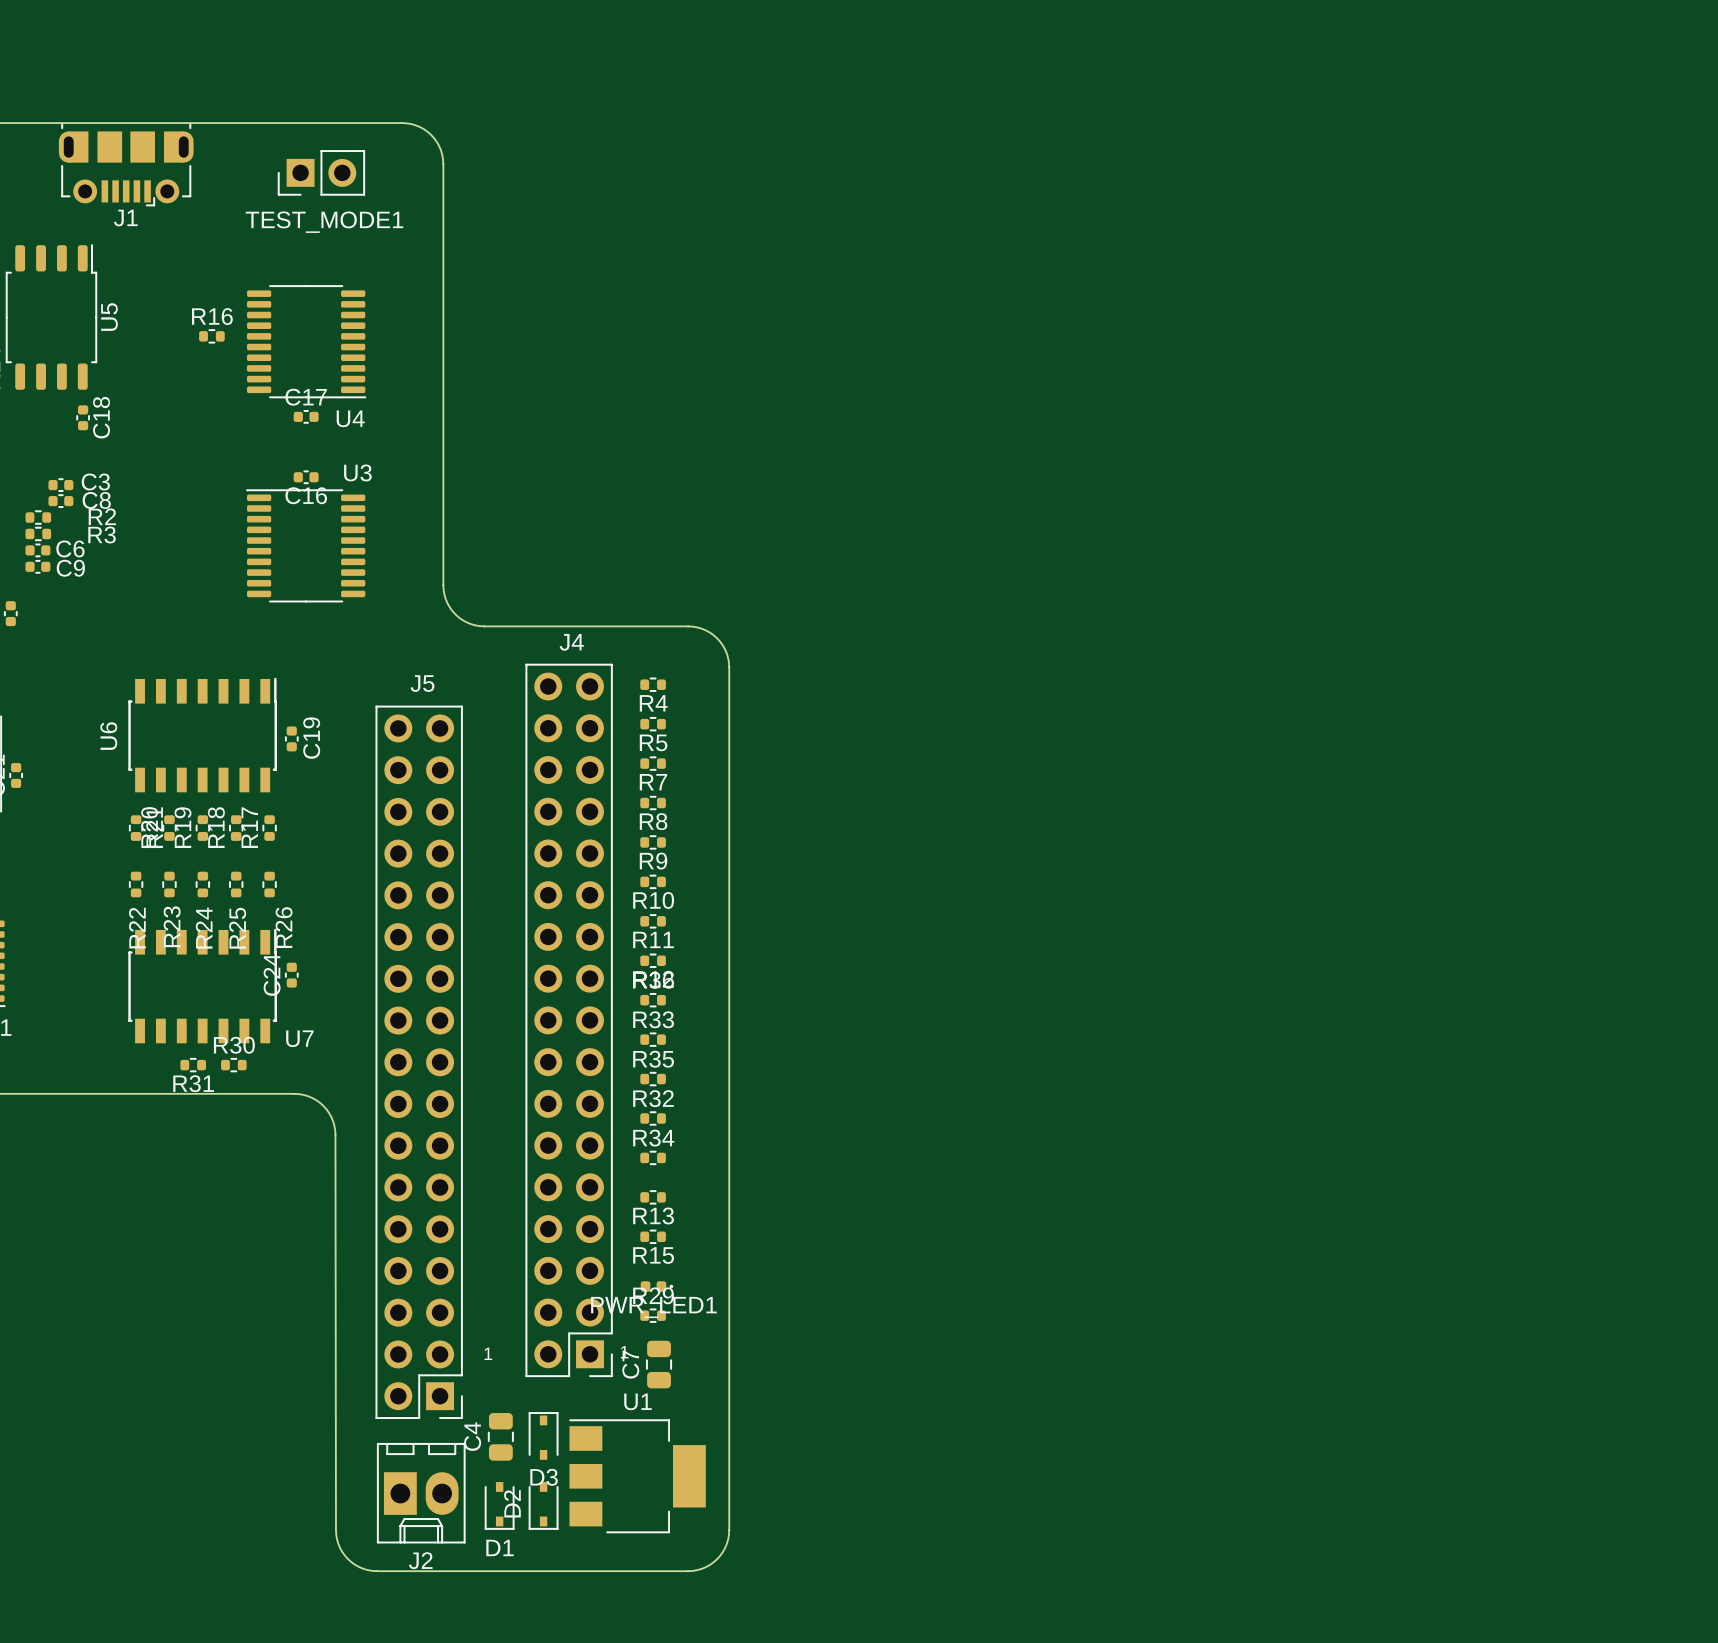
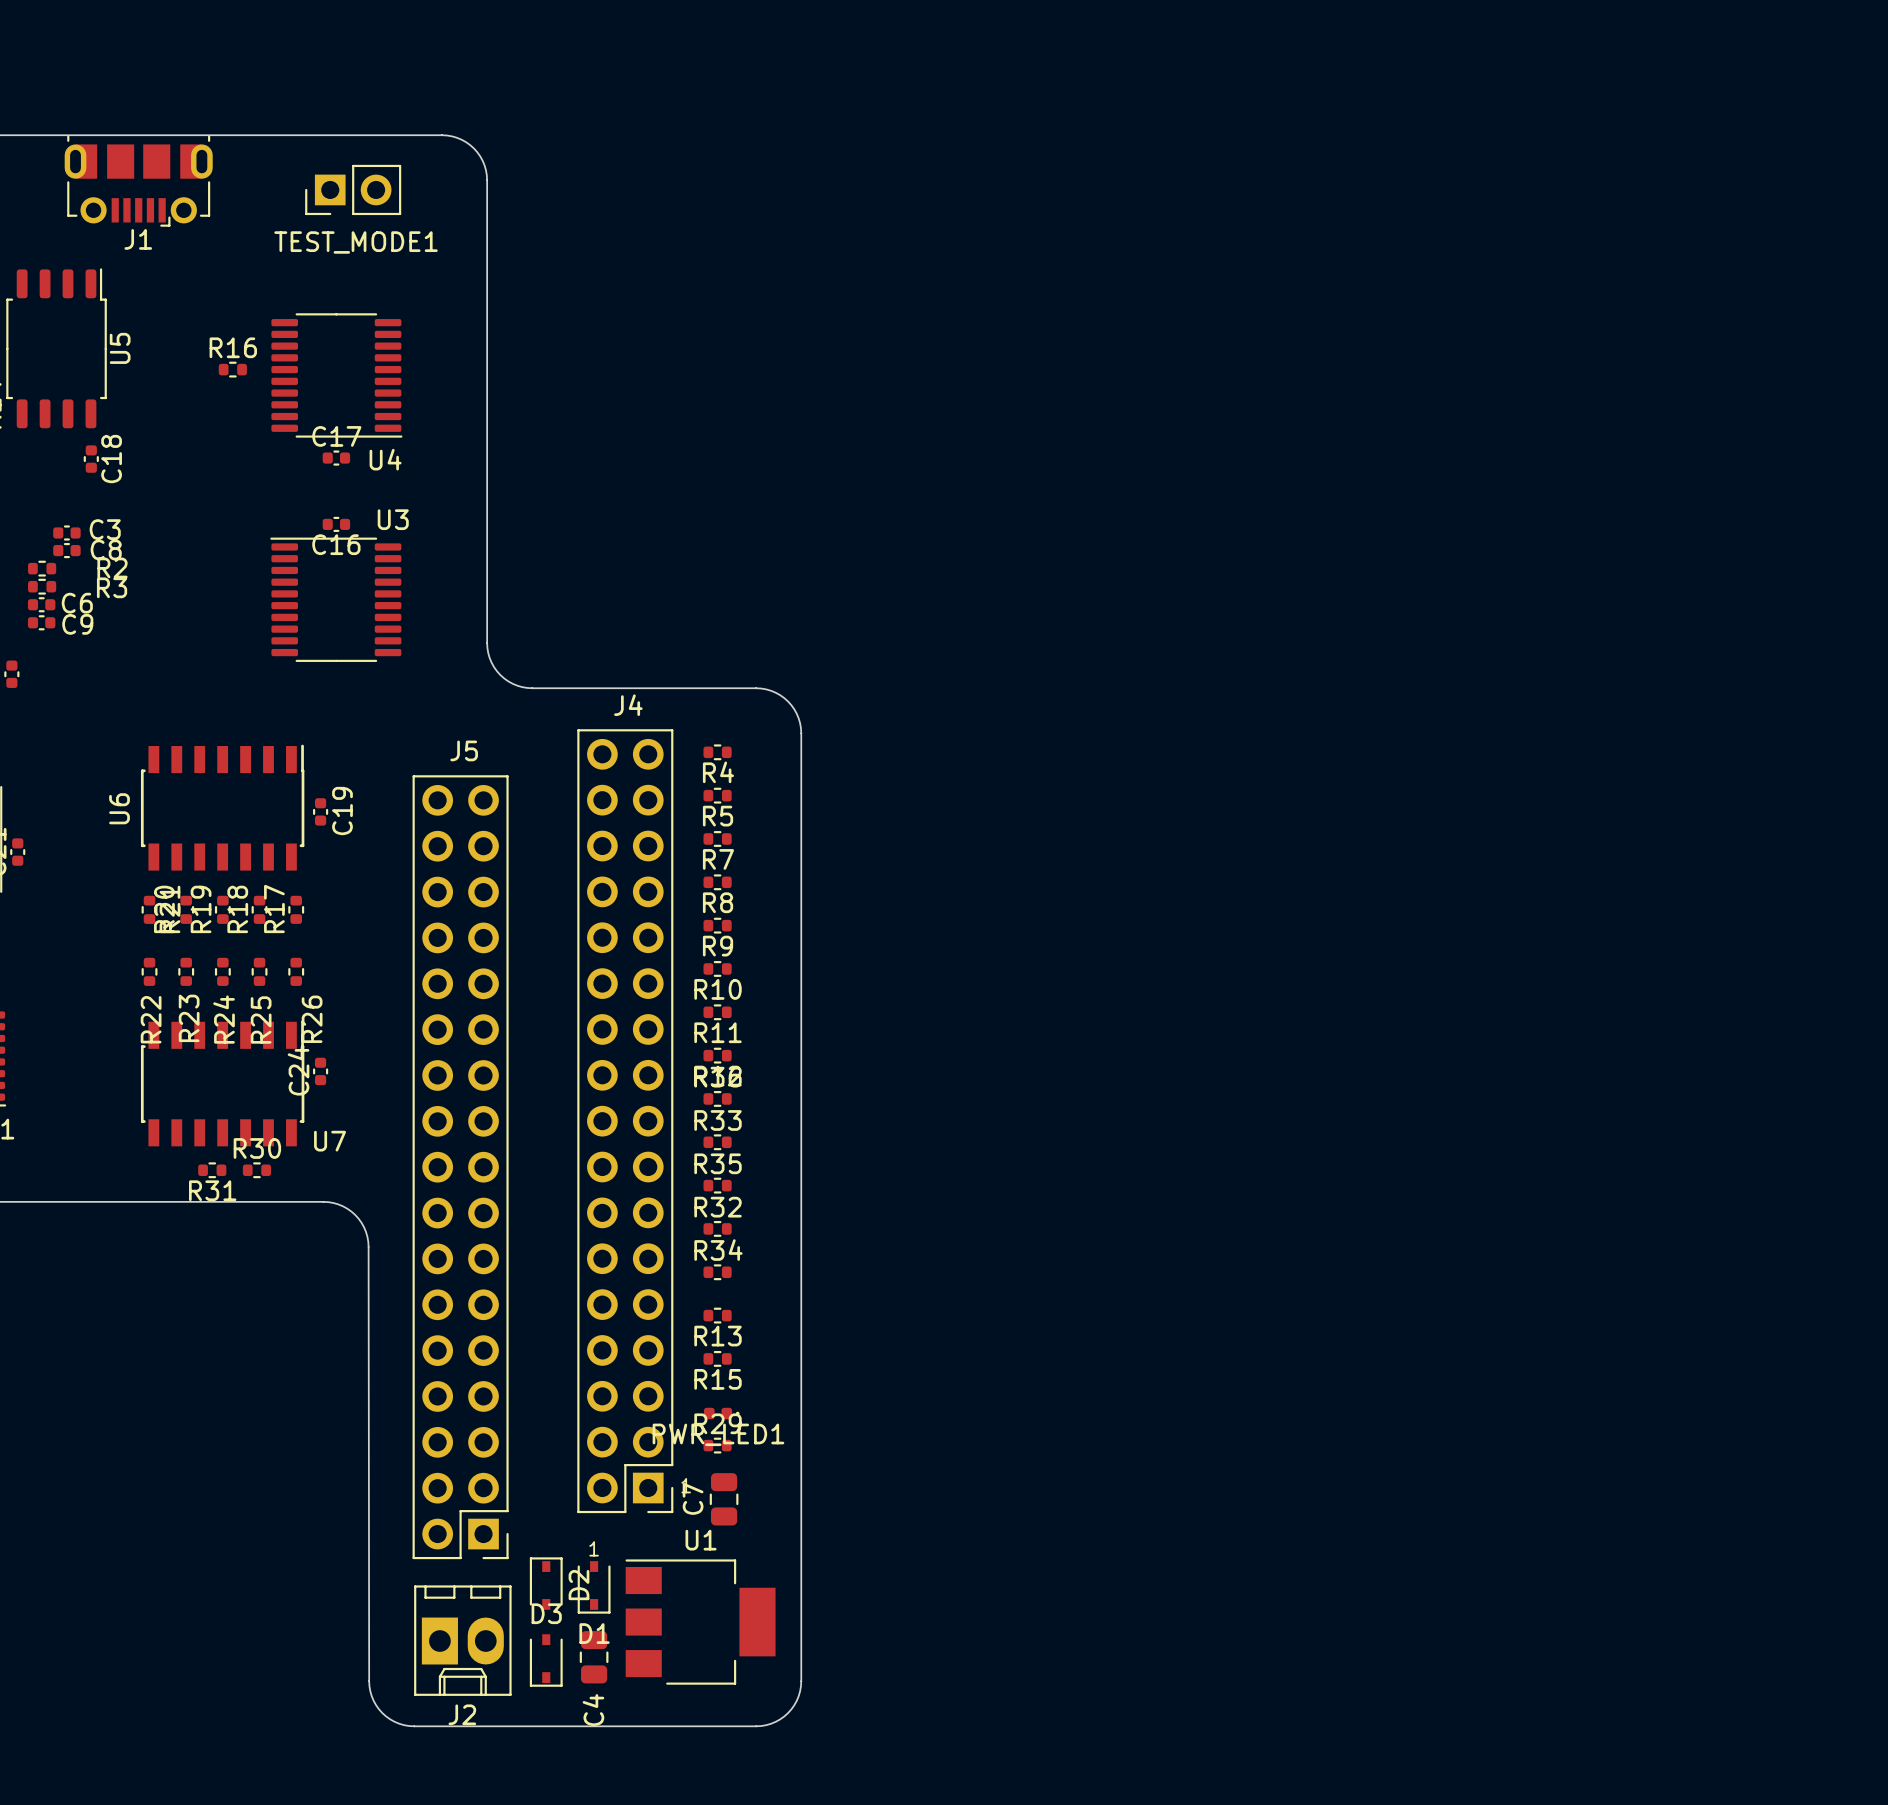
text position: 1 (488, 1353) -> 1 (594, 1548)
D3 rotation: 0° (543, 1435) -> 180° (546, 1660)
D3 position: (543, 1435) -> (546, 1660)
C4 name position: C4 (472, 1436) -> C4 (593, 1710)
C4 position: (500, 1436) -> (594, 1657)
D1 position: (499, 1505) -> (594, 1587)
D2 rotation: 0° (543, 1505) -> 180° (546, 1583)
D2 position: (543, 1505) -> (546, 1583)

